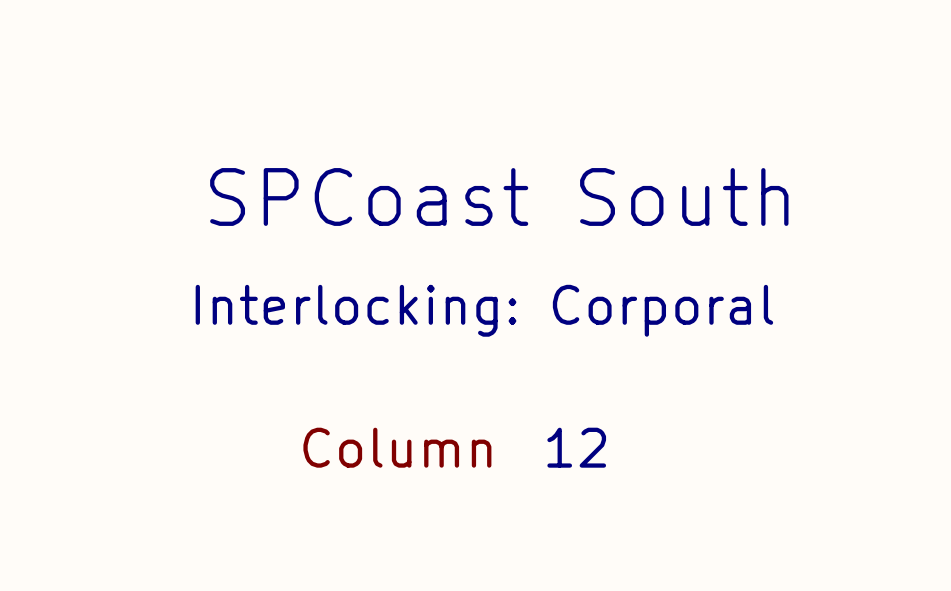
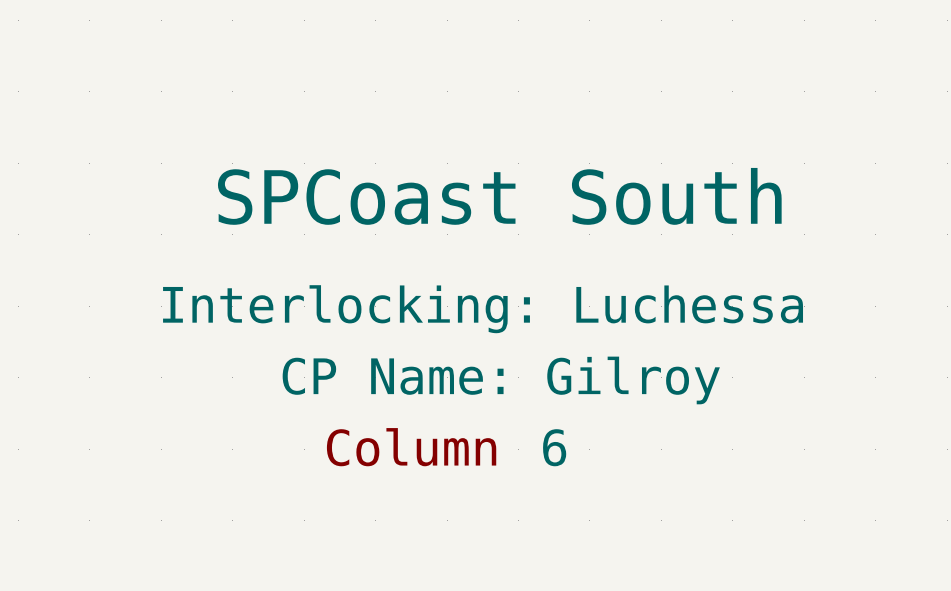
part text: Interlocking: Corporal (484, 310) -> Interlocking: Luchessa (483, 309)
part text: none -> CP Name: Gilroy (501, 380)
part value: 12 (576, 447) -> 6 (554, 447)

